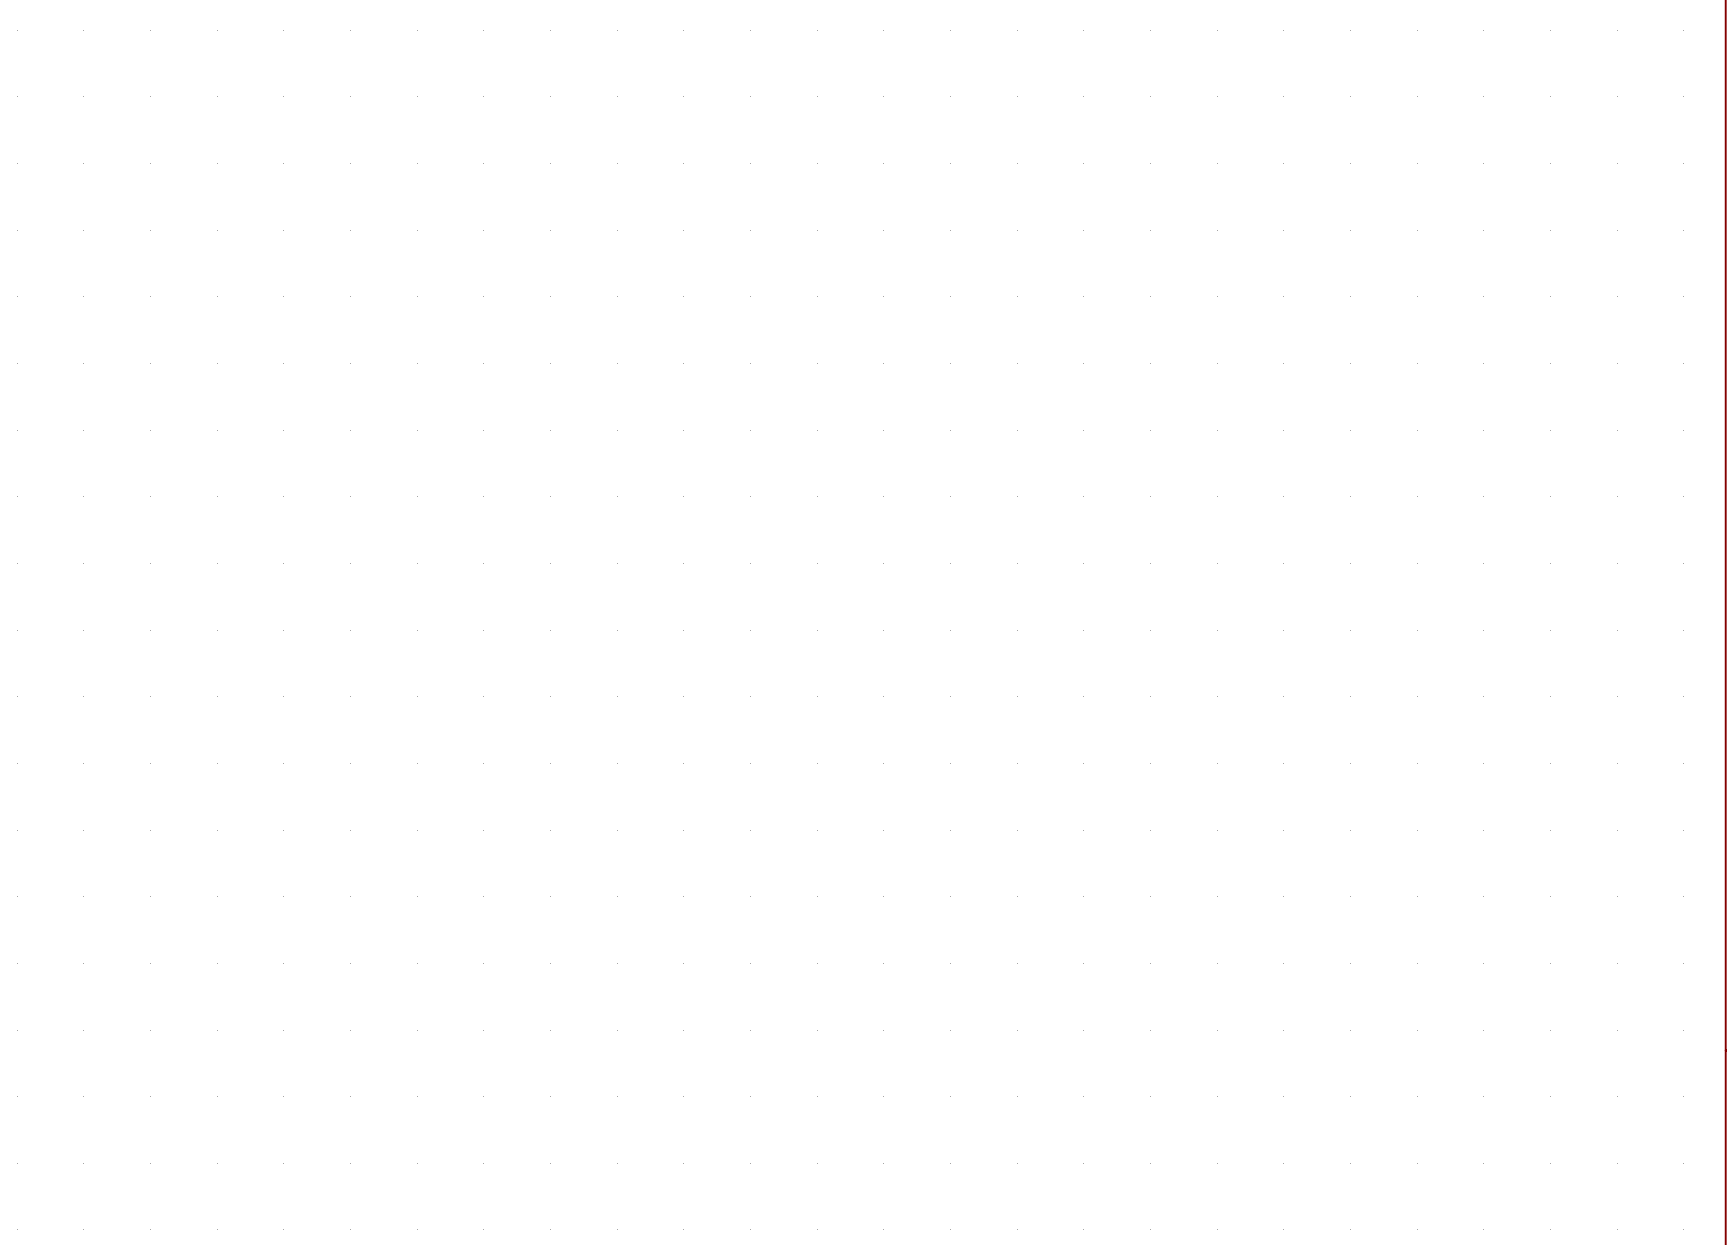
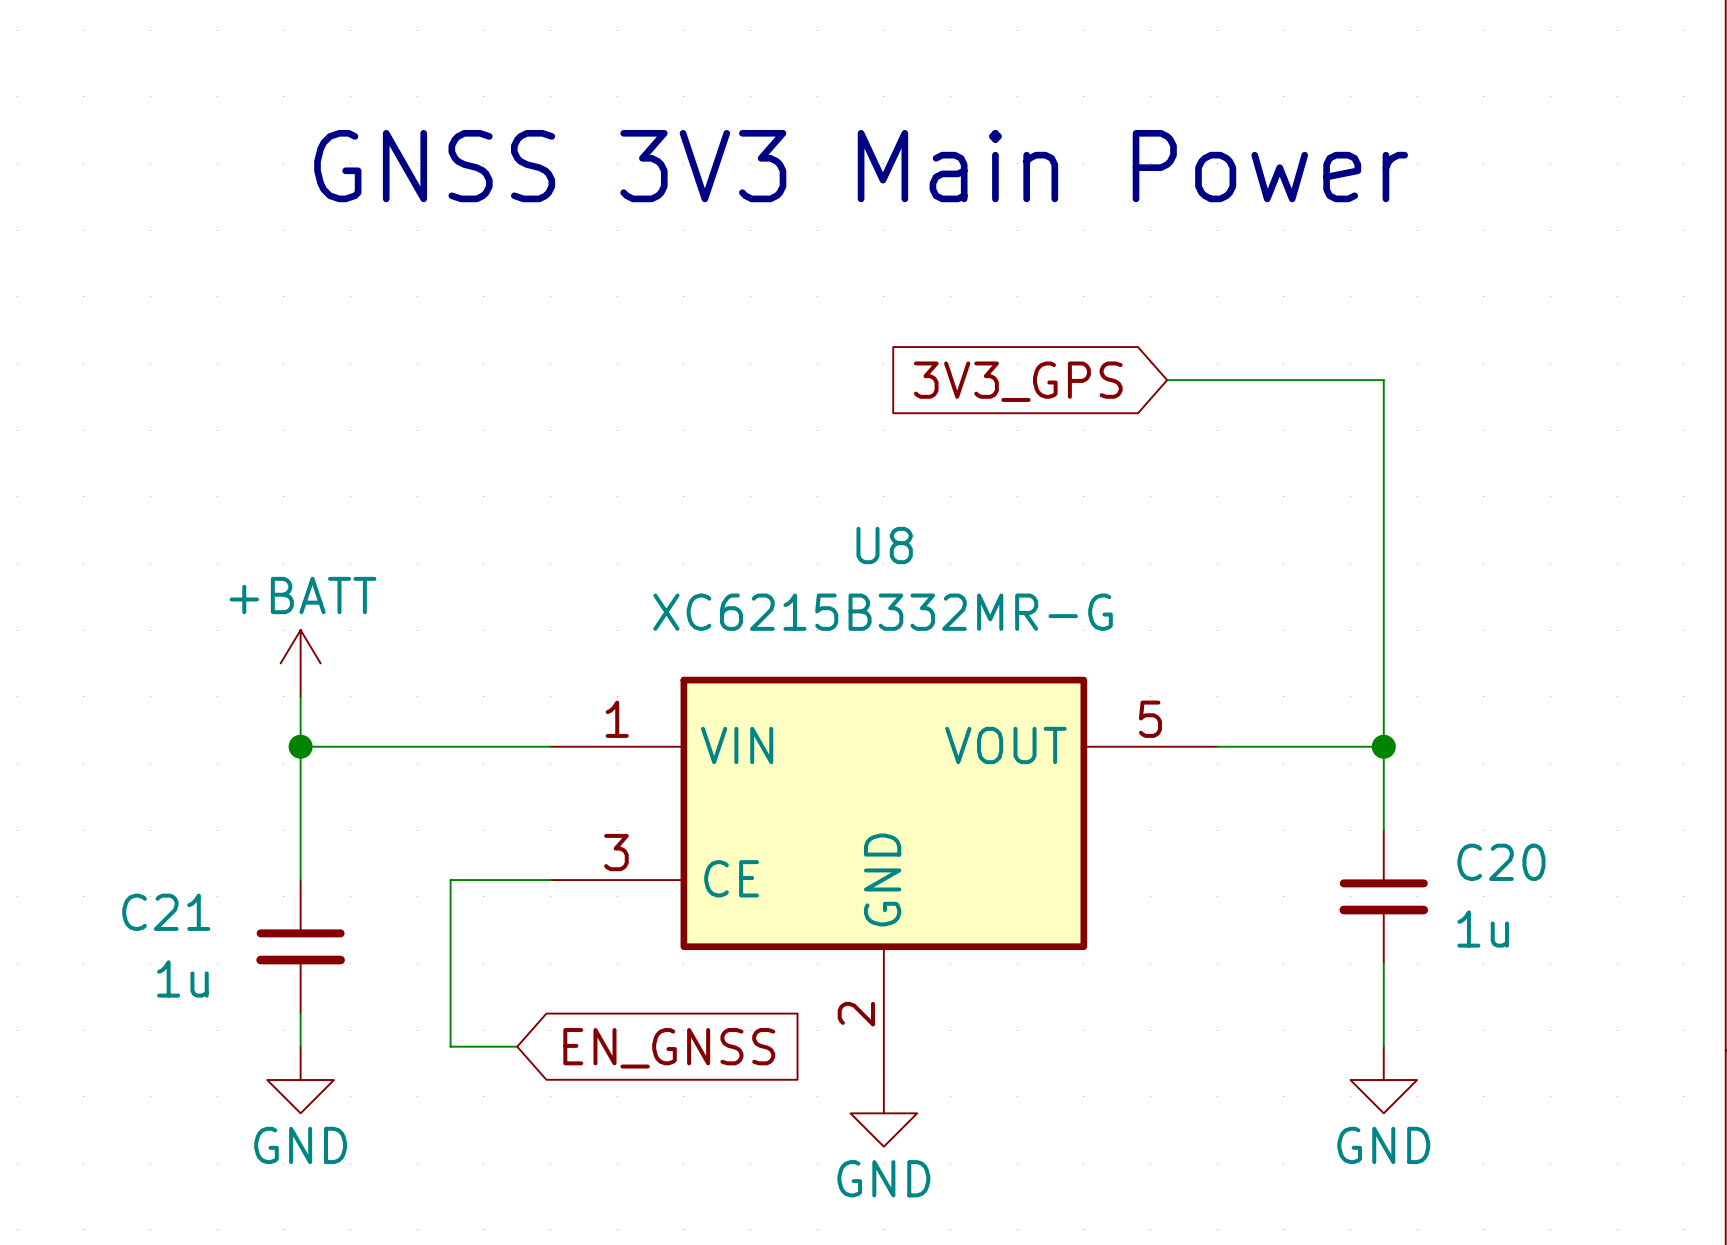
text: none -> GNSS 3V3 Main Power (861, 166)
wire: none -> (1167, 380) (1383, 380) (1383, 830)
global label: none -> 3V3_GPS (1018, 381)
power symbol: none -> +BATT (300, 663)
wire: none -> (300, 696) (300, 880)
wire: none -> (300, 746) (550, 746)
junction: none -> (300, 746)
wire: none -> (1217, 746) (1383, 746)
junction: none -> (1383, 746)
U8: none -> XC6215B332MR-G (883, 878)
wire: none -> (550, 880) (450, 880) (450, 1046) (517, 1046)
C20: none -> 1u (1383, 896)
C21: none -> 1u (300, 946)
wire: none -> (1383, 963) (1383, 1046)
wire: none -> (300, 1013) (300, 1046)
global label: none -> EN_GNSS (669, 1048)
power symbol: none -> GND (300, 1080)
power symbol: none -> GND (1383, 1080)
power symbol: none -> GND (883, 1113)

